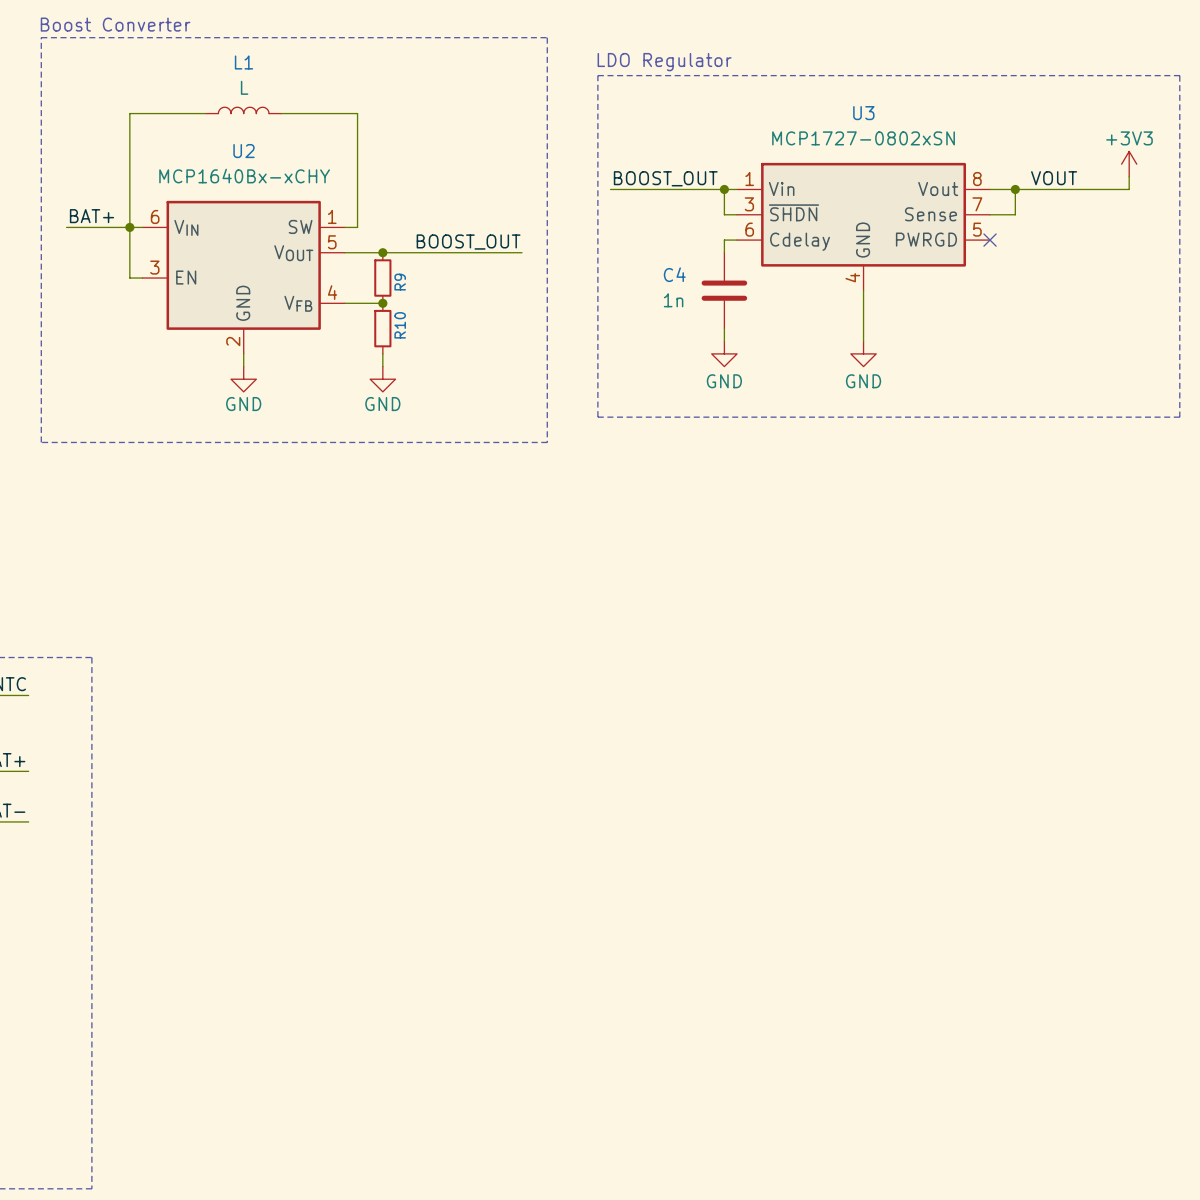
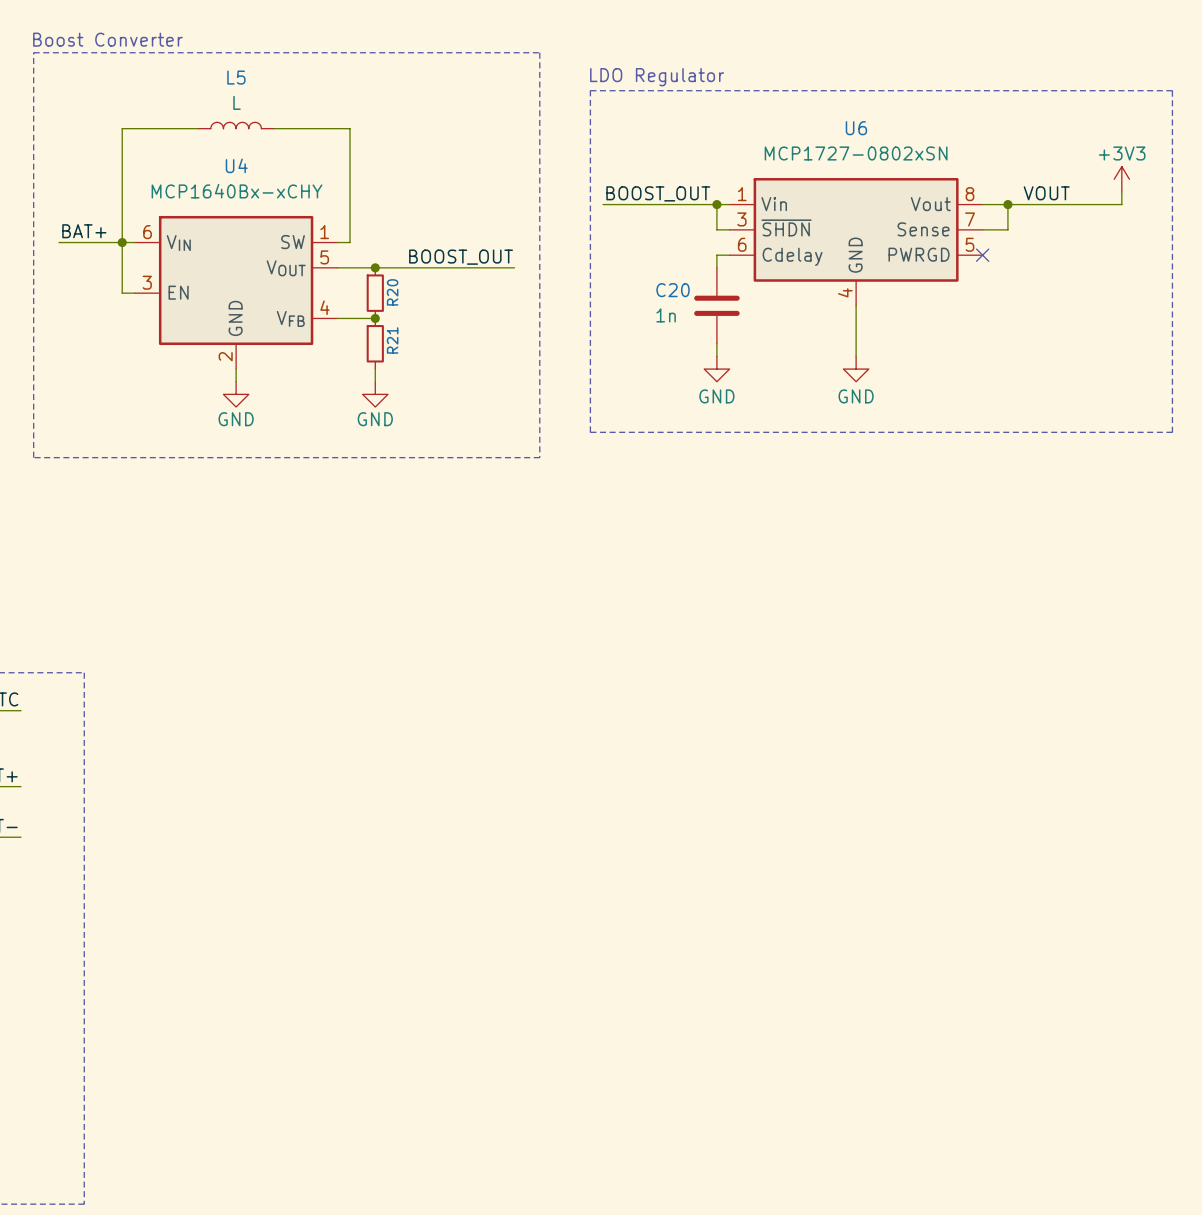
L1 name: L1 (244, 62) -> L5 (236, 77)
U3 name: U3 (863, 113) -> U6 (856, 128)
U2 name: U2 (244, 151) -> U4 (236, 165)
C4 name: C4 (674, 274) -> C20 (673, 290)
R9 name: R9 (400, 282) -> R20 (392, 292)
R10 name: R10 (400, 325) -> R21 (392, 340)

